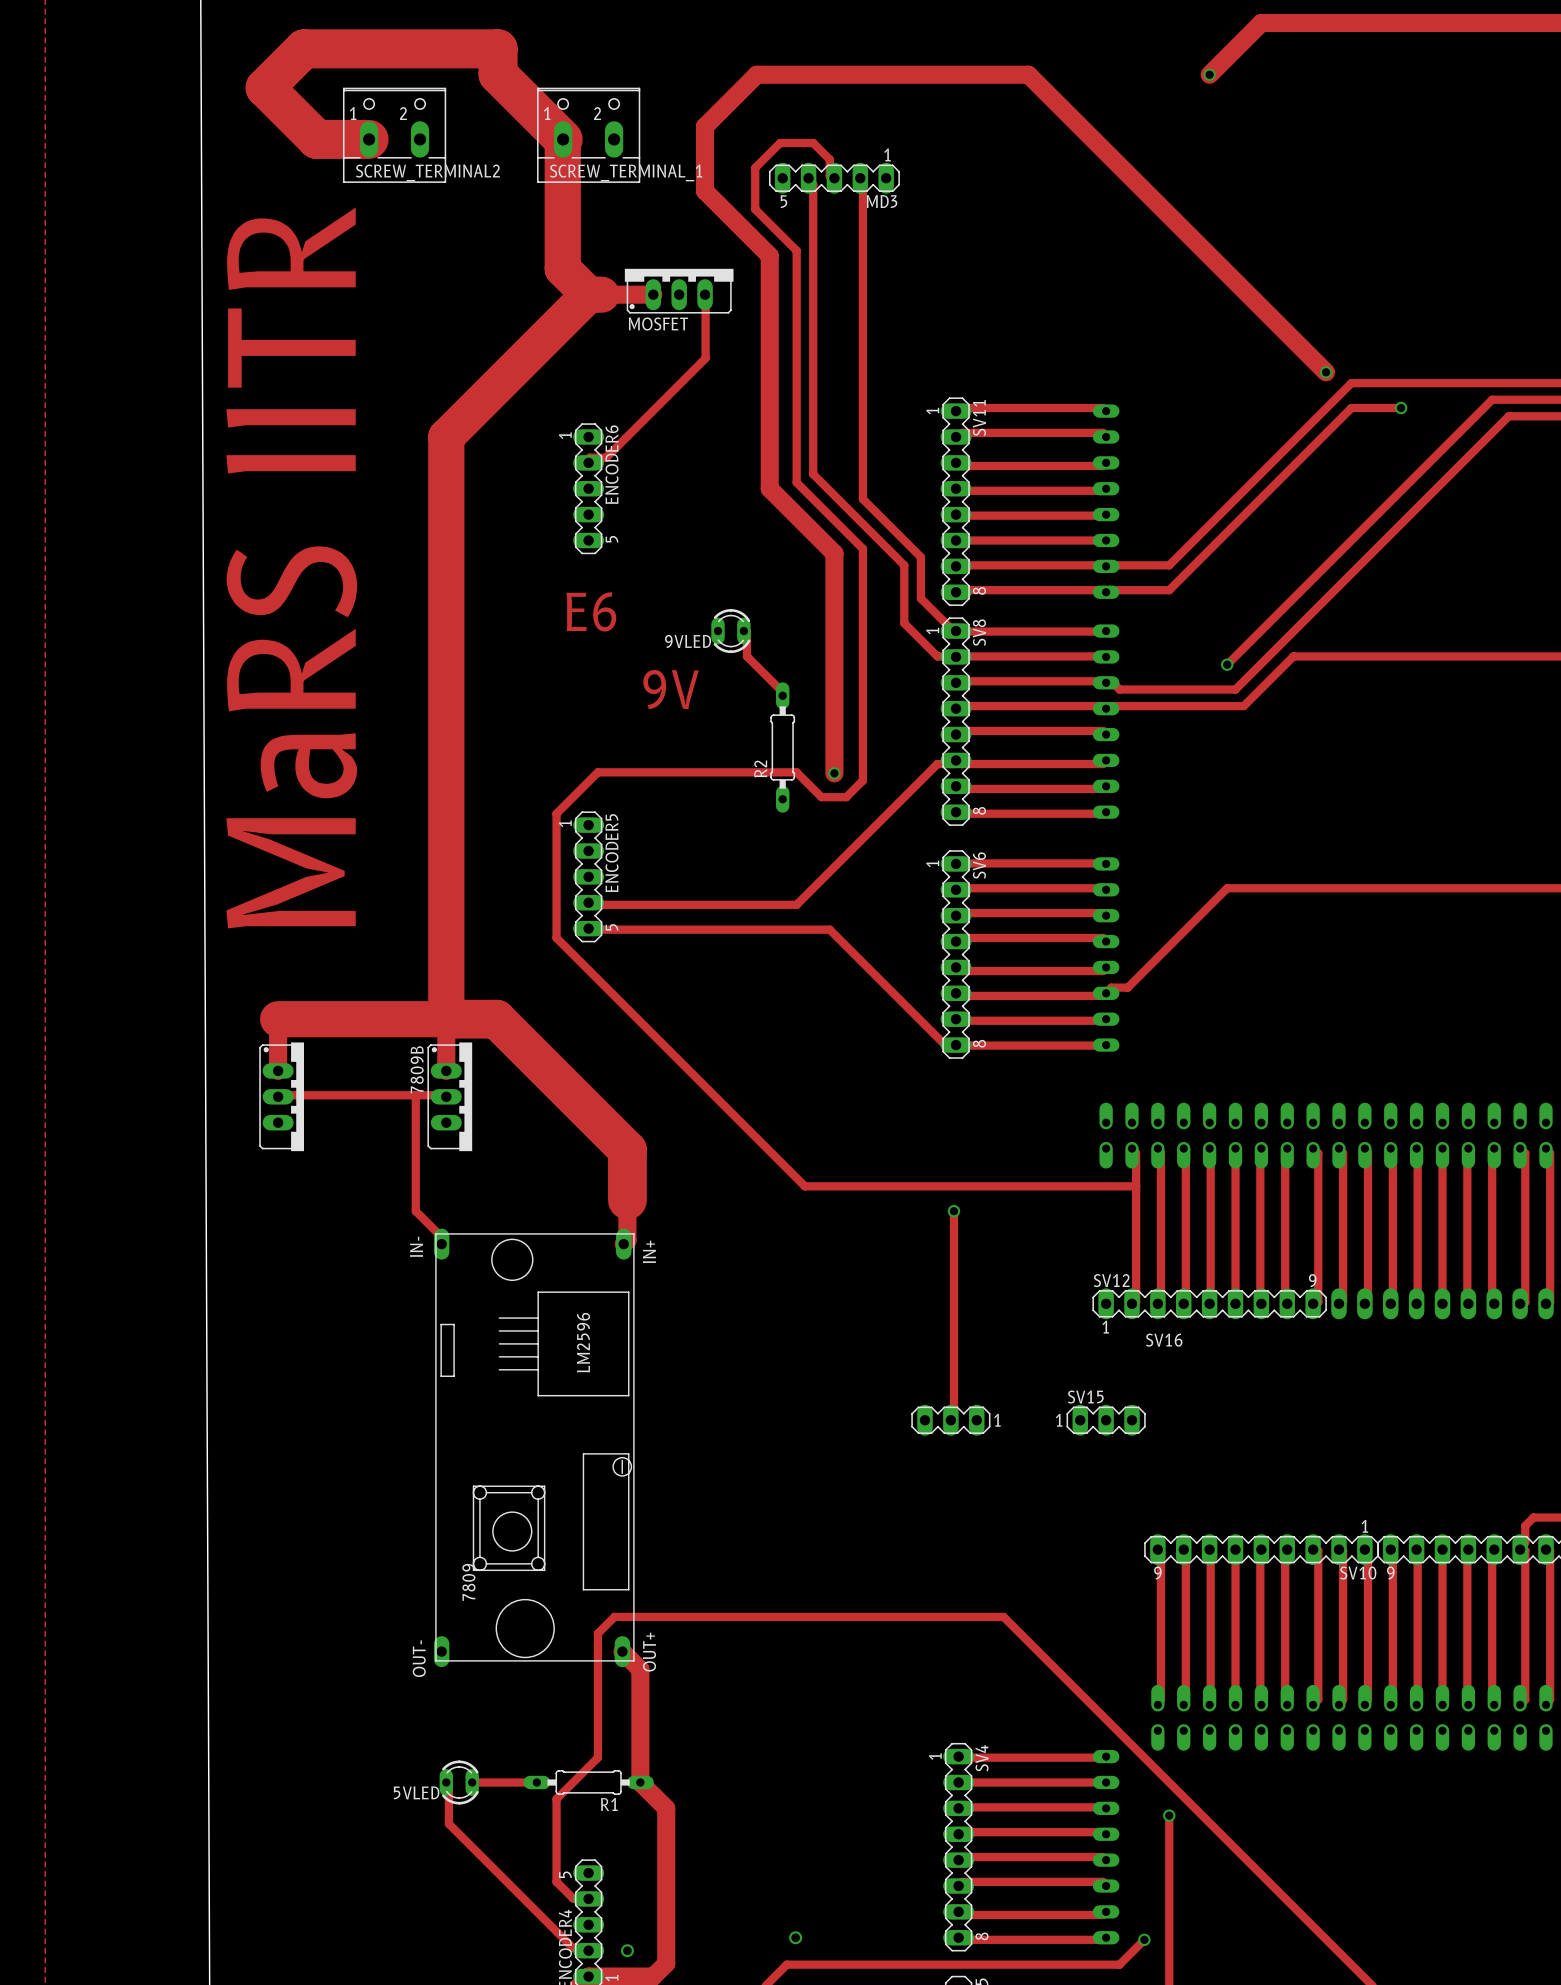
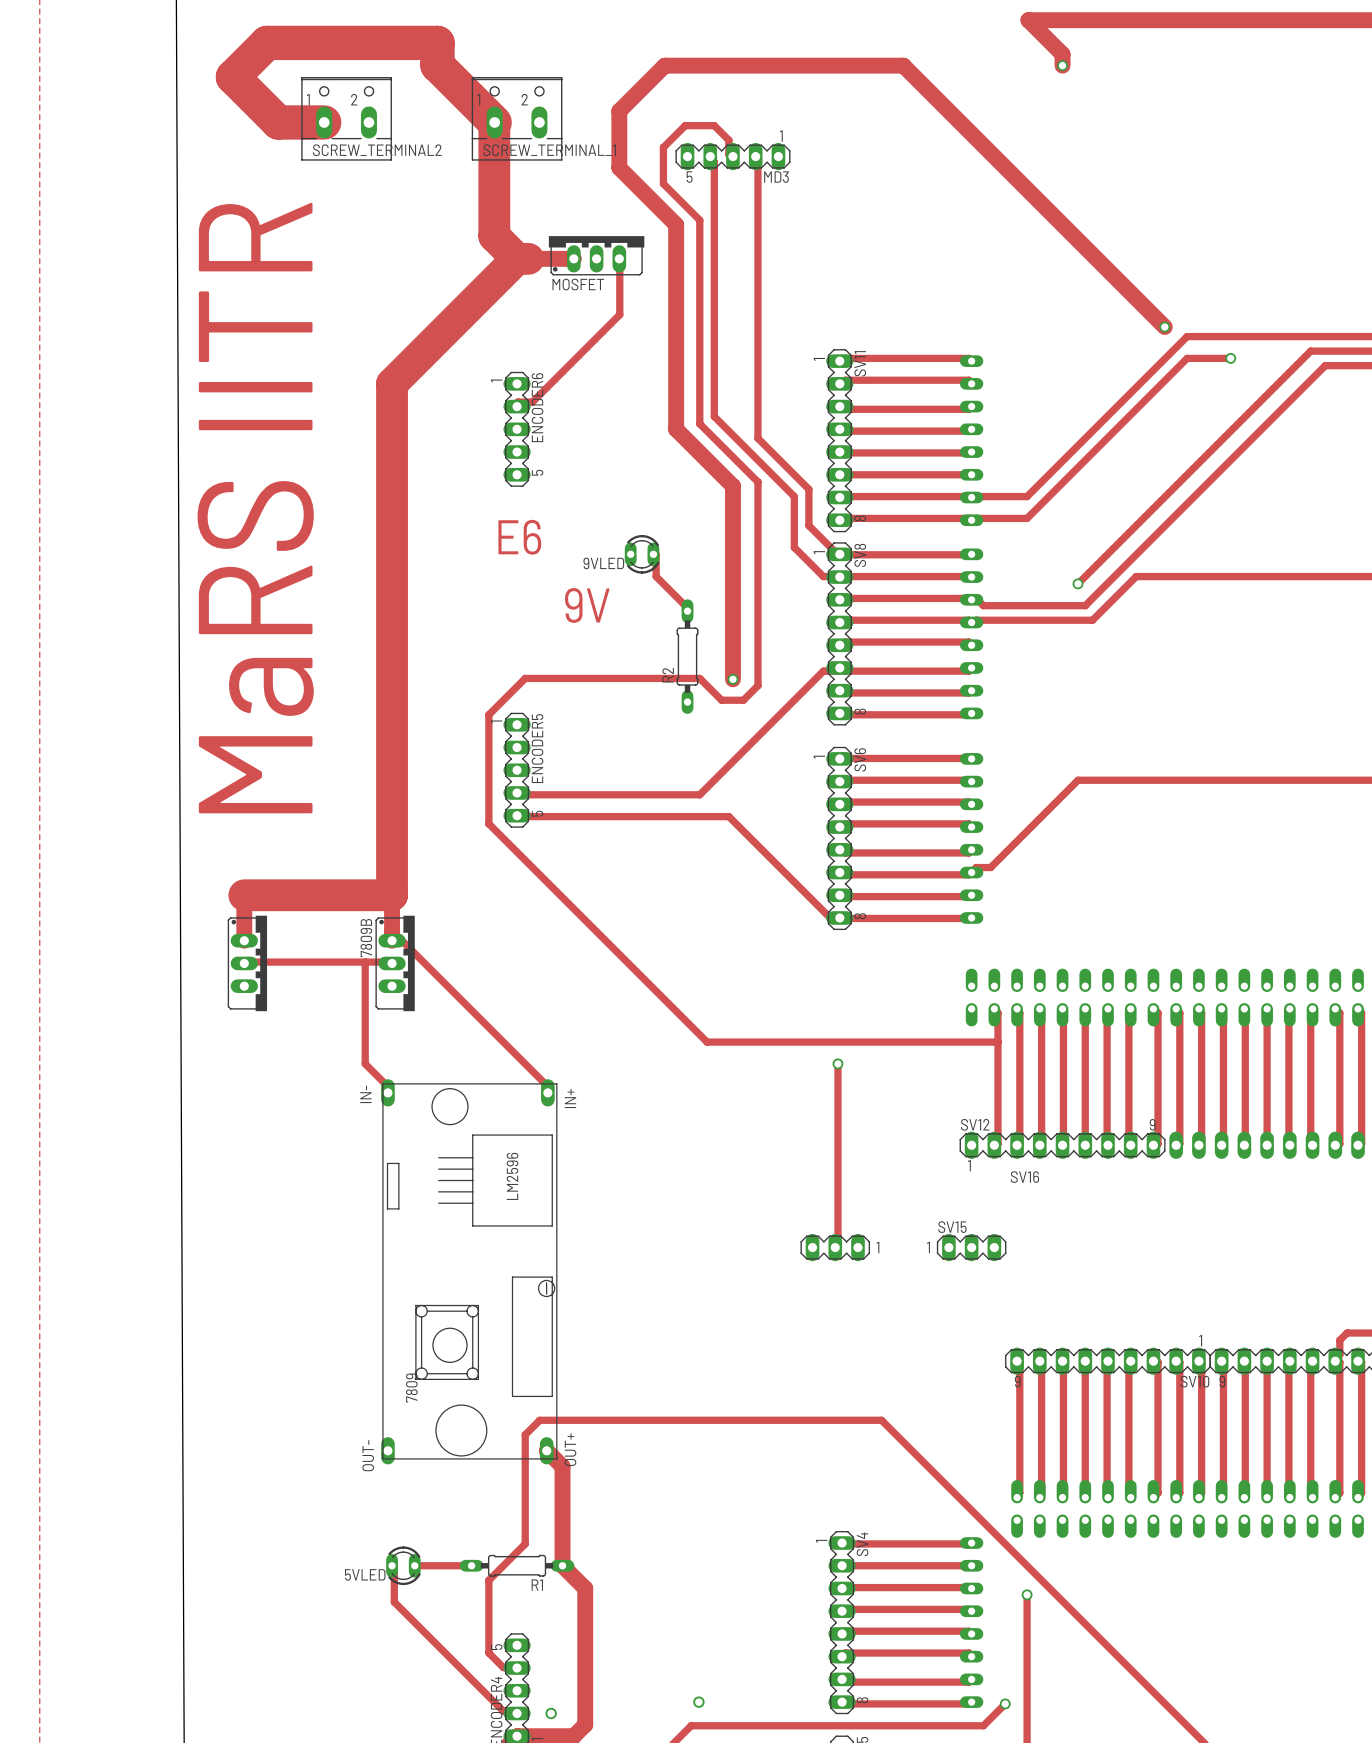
track: (1261, 22) (1209, 74) -> (1108, 20) (1028, 20) (1062, 54) (1062, 65)
track: (446, 1019) (496, 1019) (627, 1150) (627, 1240) (623, 1244) -> (392, 932) (394, 932) (547, 1085) (547, 1092)

